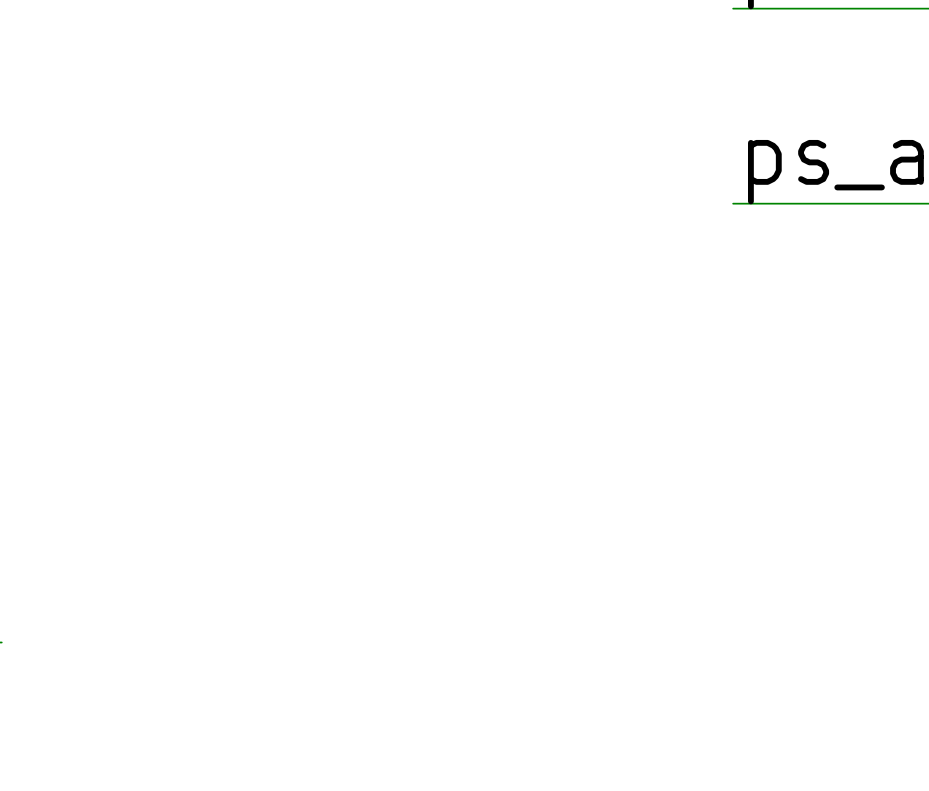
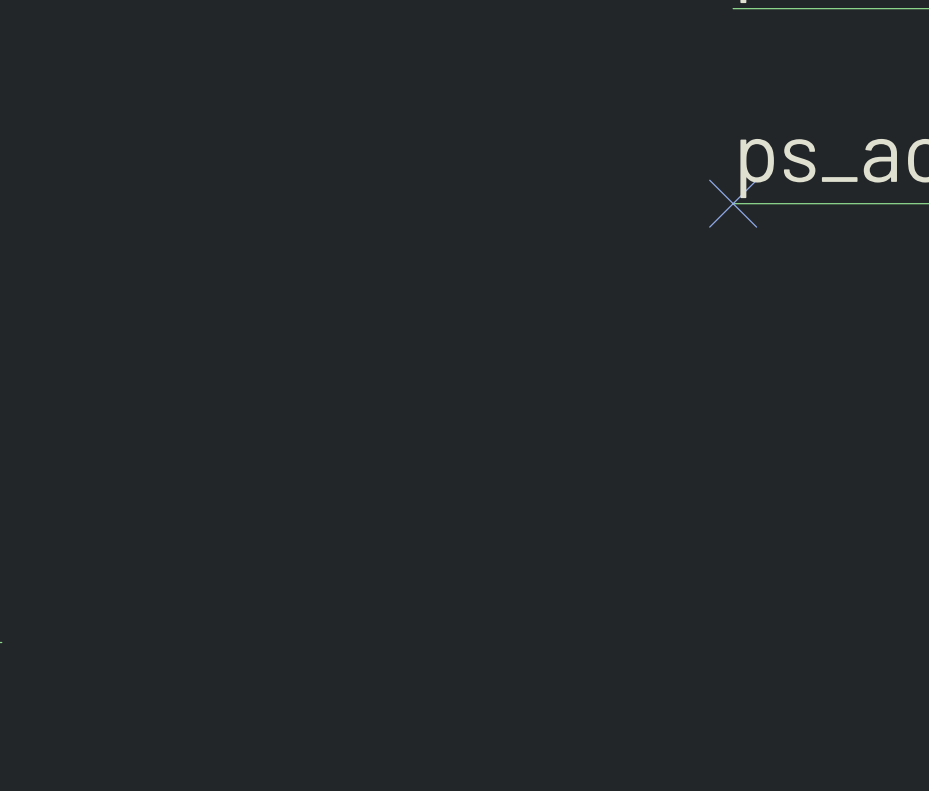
no-connect mark: none -> (733, 203)

